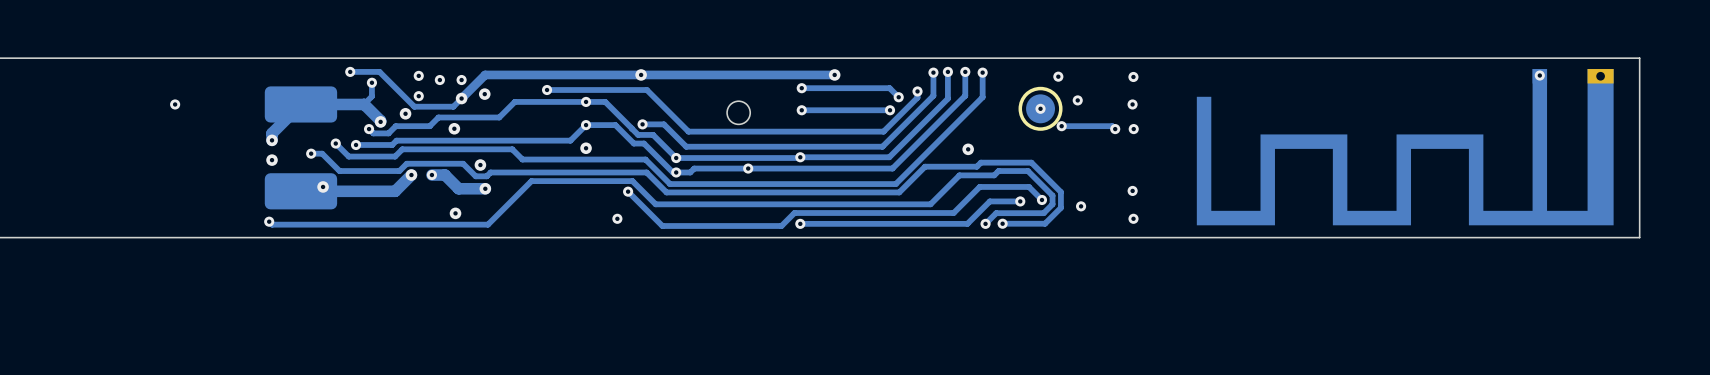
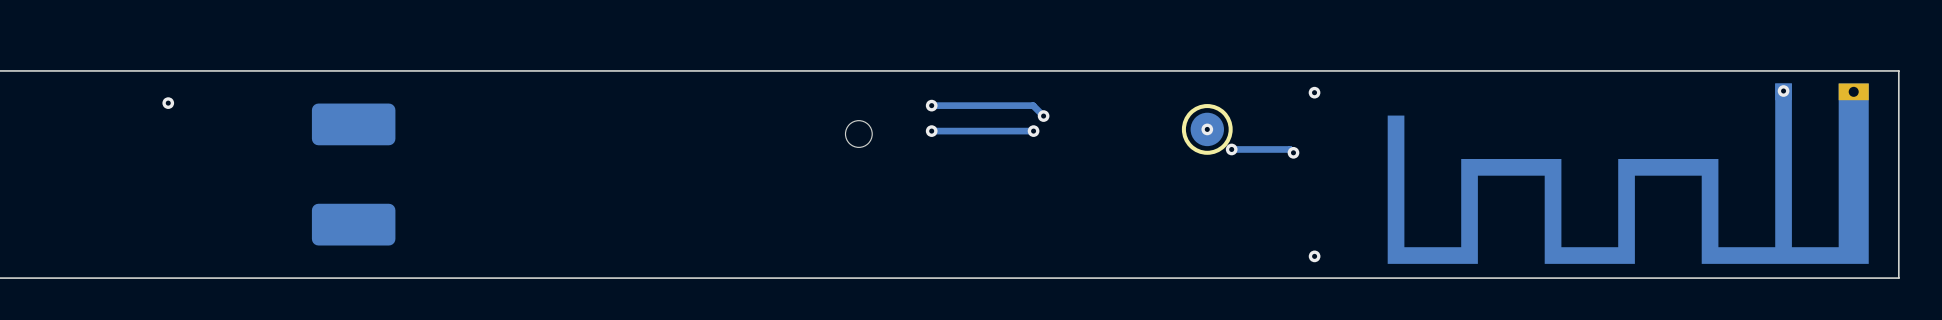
track: (350, 71) (379, 71) (414, 106) (453, 106) (485, 74) (834, 74) -> none
via: (350, 71) -> none
track: (947, 71) (947, 98) (889, 157) (676, 158) (653, 134) (638, 134) (605, 101) (514, 101) (499, 117) (438, 117) (429, 126) (395, 126) (388, 133) (373, 133) (369, 129) -> none
via: (947, 71) -> none
track: (965, 71) (965, 95) (892, 168) (694, 168) (690, 172) (672, 172) (644, 143) (633, 143) (615, 125) (586, 125) (570, 140) (396, 140) (392, 144) (356, 144) -> none
via: (965, 71) -> none
track: (933, 72) (933, 95) (882, 146) (686, 146) (663, 124) (642, 124) -> none
via: (933, 72) -> none
track: (982, 72) (982, 97) (895, 184) (670, 184) (645, 159) (522, 159) (512, 149) (402, 149) (395, 156) (348, 156) (335, 143) -> none
via: (982, 72) -> none
via: (641, 74) -> none
via: (834, 74) -> none
via: (418, 75) -> none
via: (1058, 76) -> none
via: (439, 80) -> none
via: (461, 80) -> none
track: (371, 82) (371, 96) (363, 104) -> none
via: (371, 82) -> none
track: (547, 90) (646, 90) (688, 131) (883, 131) (917, 97) (917, 91) -> none
via: (547, 90) -> none
via: (917, 91) -> none
via: (484, 94) -> none
via: (418, 96) -> none
via: (461, 98) -> none
via: (1077, 100) -> none
via: (586, 101) -> none
via position: (175, 104) -> (168, 103)
via: (1132, 104) -> none
via: (405, 113) -> none
track: (380, 121) (364, 104) (300, 104) (272, 133) (272, 140) -> none
via: (380, 121) -> none
via: (642, 124) -> none
via: (586, 125) -> none
via: (454, 128) -> none
via: (369, 129) -> none
via: (1133, 129) -> none
via: (272, 140) -> none
via: (335, 143) -> none
via: (356, 144) -> none
via: (586, 148) -> none
via: (968, 149) -> none
track: (311, 153) (322, 153) (339, 171) (399, 171) (406, 163) (463, 163) (475, 176) (486, 176) (490, 172) (646, 172) (666, 192) (899, 192) (925, 166) (976, 166) (980, 162) (1031, 162) (1060, 192) (1060, 207) (1045, 223) (1002, 223) -> none
via: (311, 153) -> none
via: (800, 157) -> none
via: (676, 158) -> none
via: (272, 160) -> none
via: (480, 165) -> none
via: (748, 168) -> none
via: (676, 172) -> none
track: (411, 175) (395, 191) (300, 191) -> none
via: (411, 175) -> none
track: (431, 175) (444, 175) (458, 188) (485, 188) -> none
via: (431, 175) -> none
via: (323, 186) -> none
via: (485, 188) -> none
via: (1132, 190) -> none
track: (628, 191) (662, 226) (781, 226) (794, 213) (953, 213) (979, 186) (1028, 186) (1041, 199) -> none
via: (628, 191) -> none
via: (1041, 199) -> none
track: (1020, 201) (989, 201) (967, 223) (800, 223) -> none
via: (1020, 201) -> none
via: (1081, 206) -> none
via: (455, 213) -> none
via: (617, 218) -> none
track: (269, 221) (272, 224) (487, 224) (531, 181) (632, 181) (655, 204) (930, 204) (959, 175) (994, 175) (998, 171) (1027, 171) (1052, 195) (1052, 204) (1043, 213) (996, 213) (985, 223) -> none
via: (269, 221) -> none
via: (800, 223) -> none
via: (985, 223) -> none
via: (1002, 223) -> none

